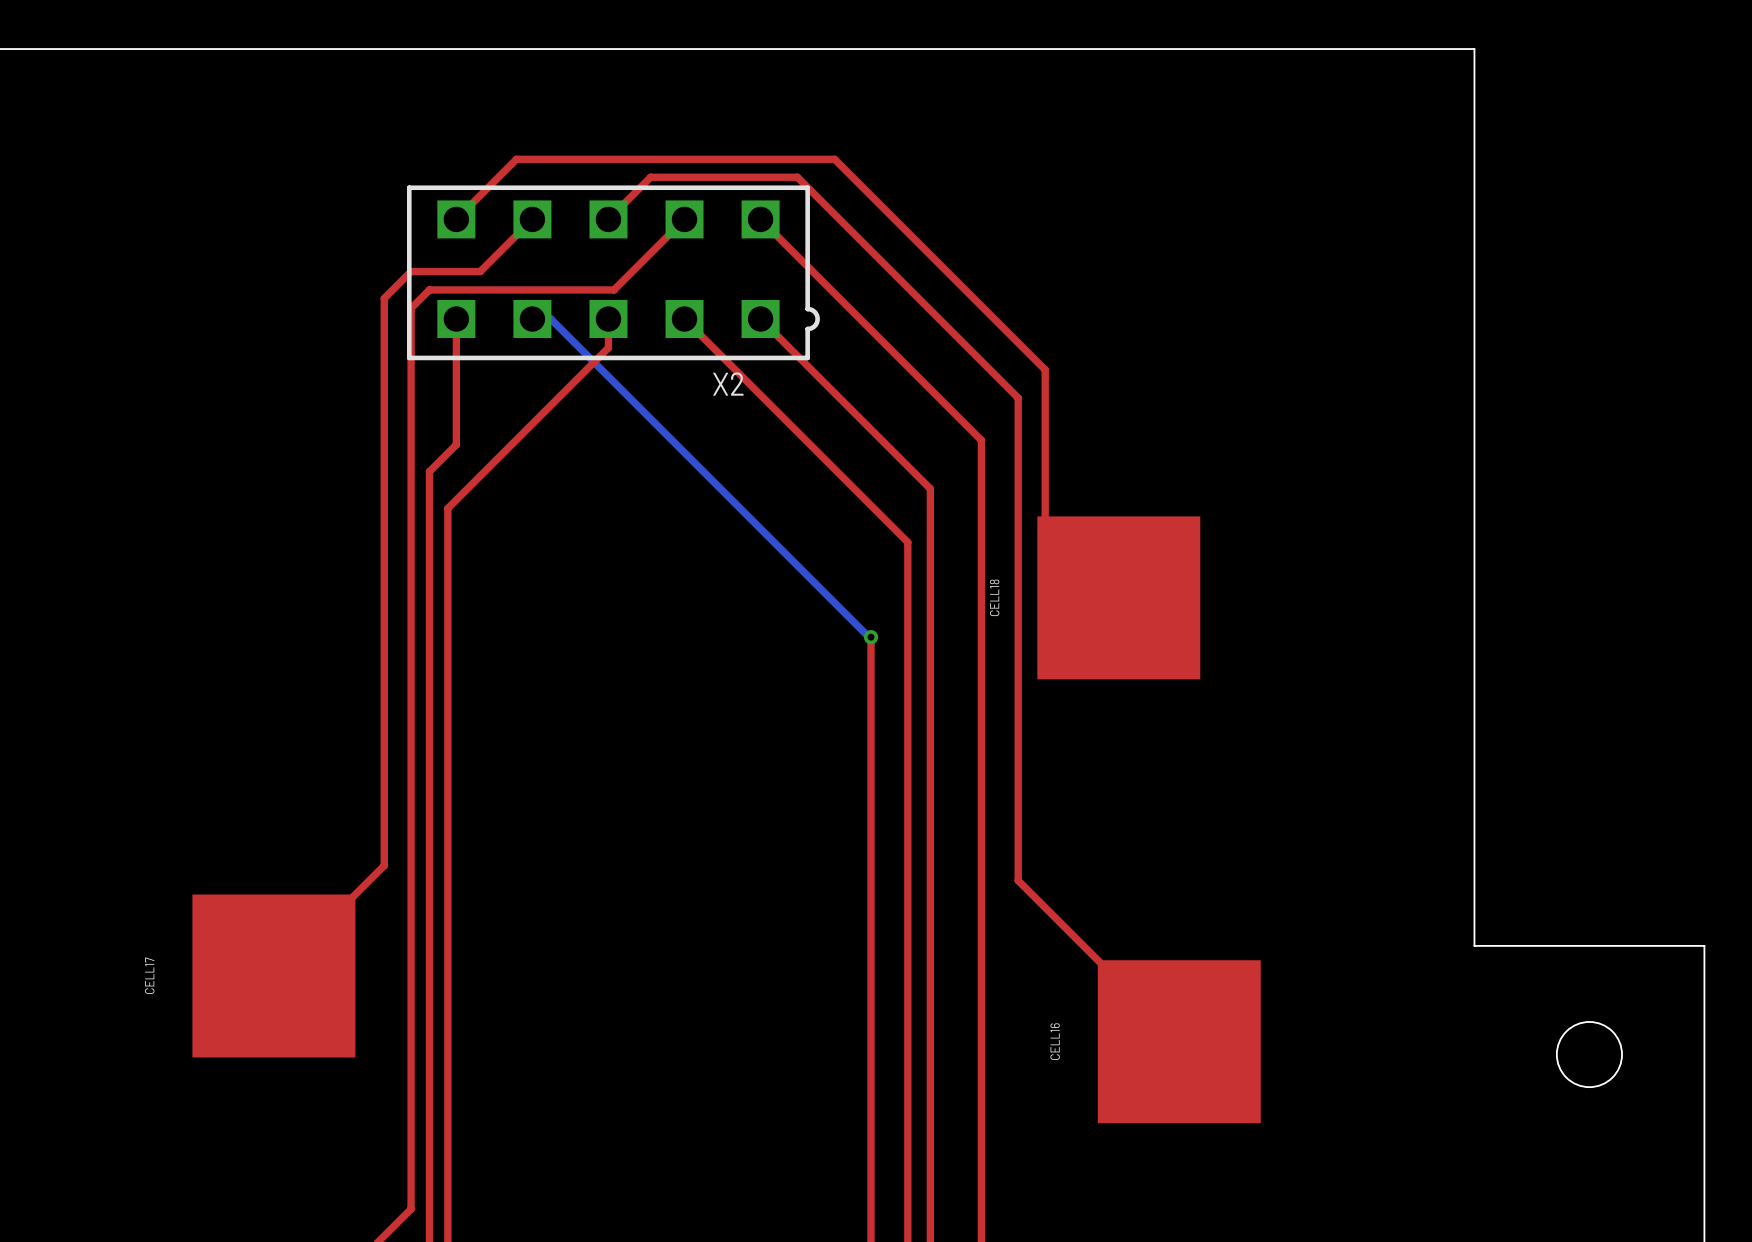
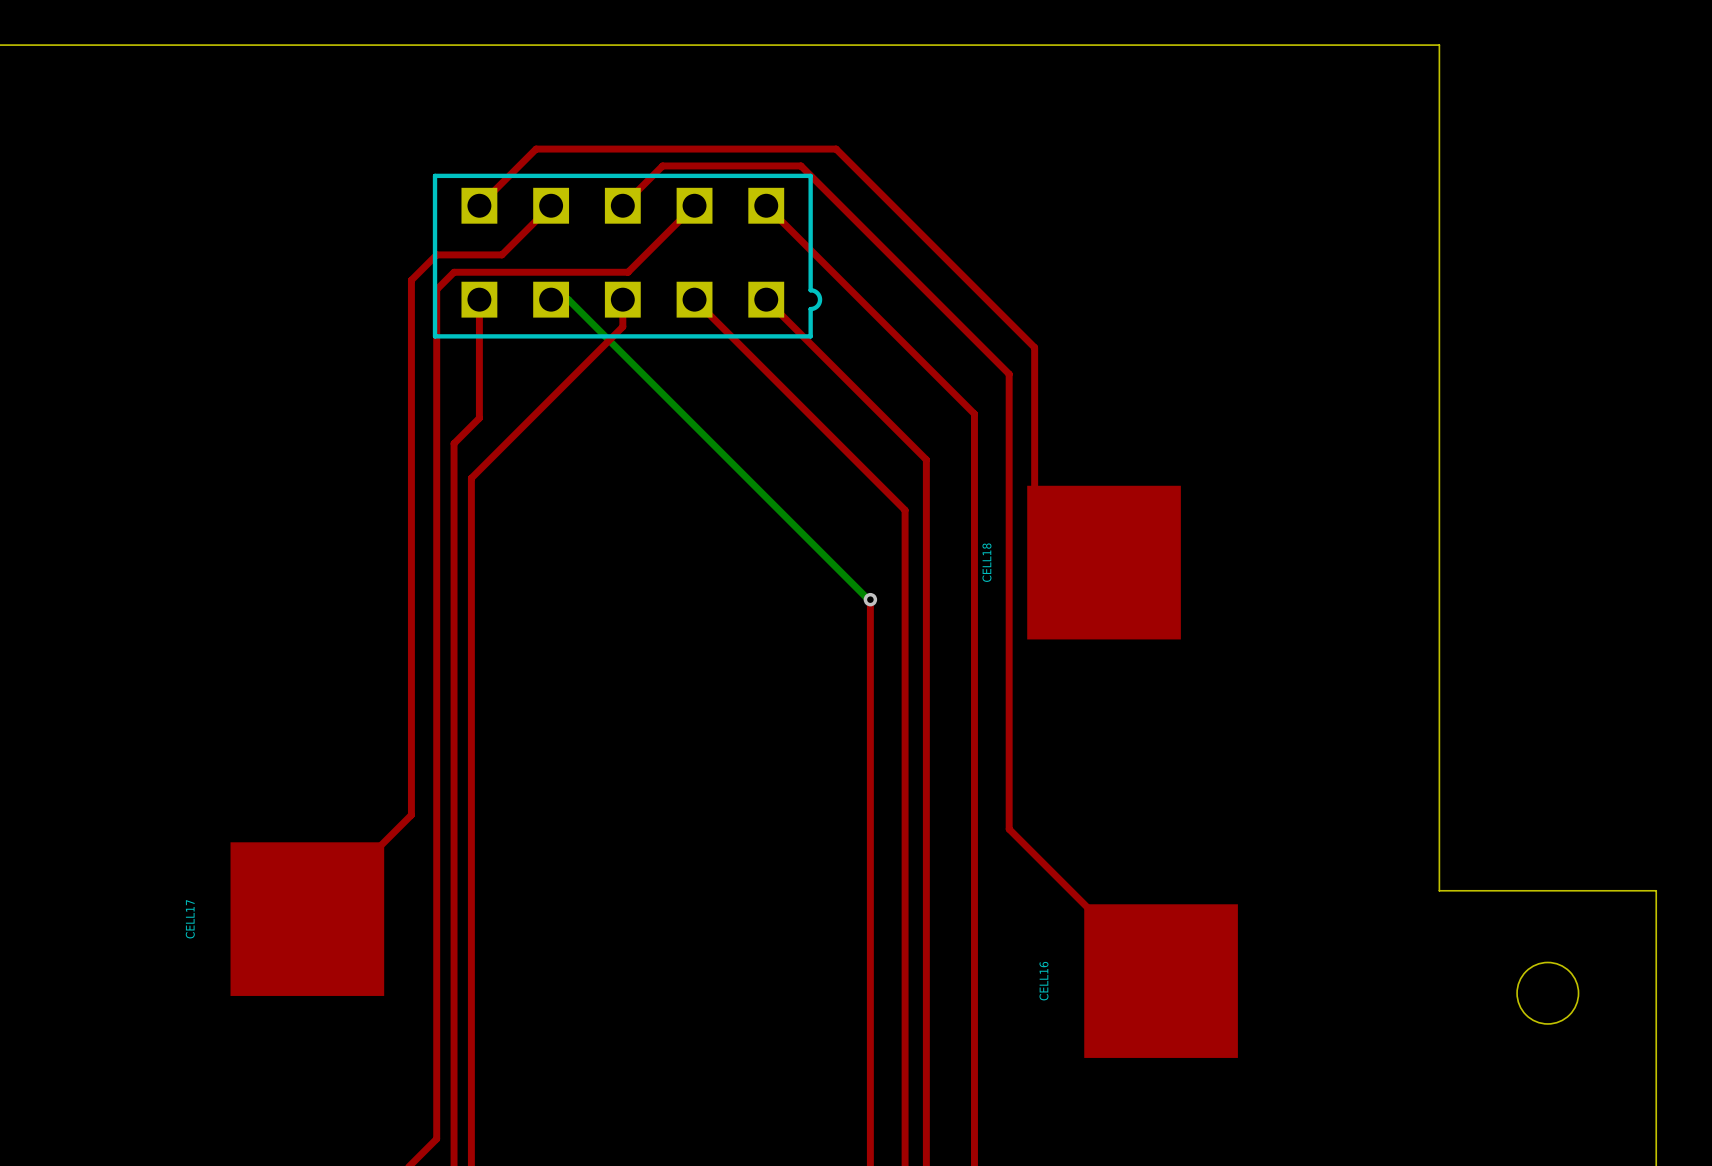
X2 name: X2 (728, 384) -> none

